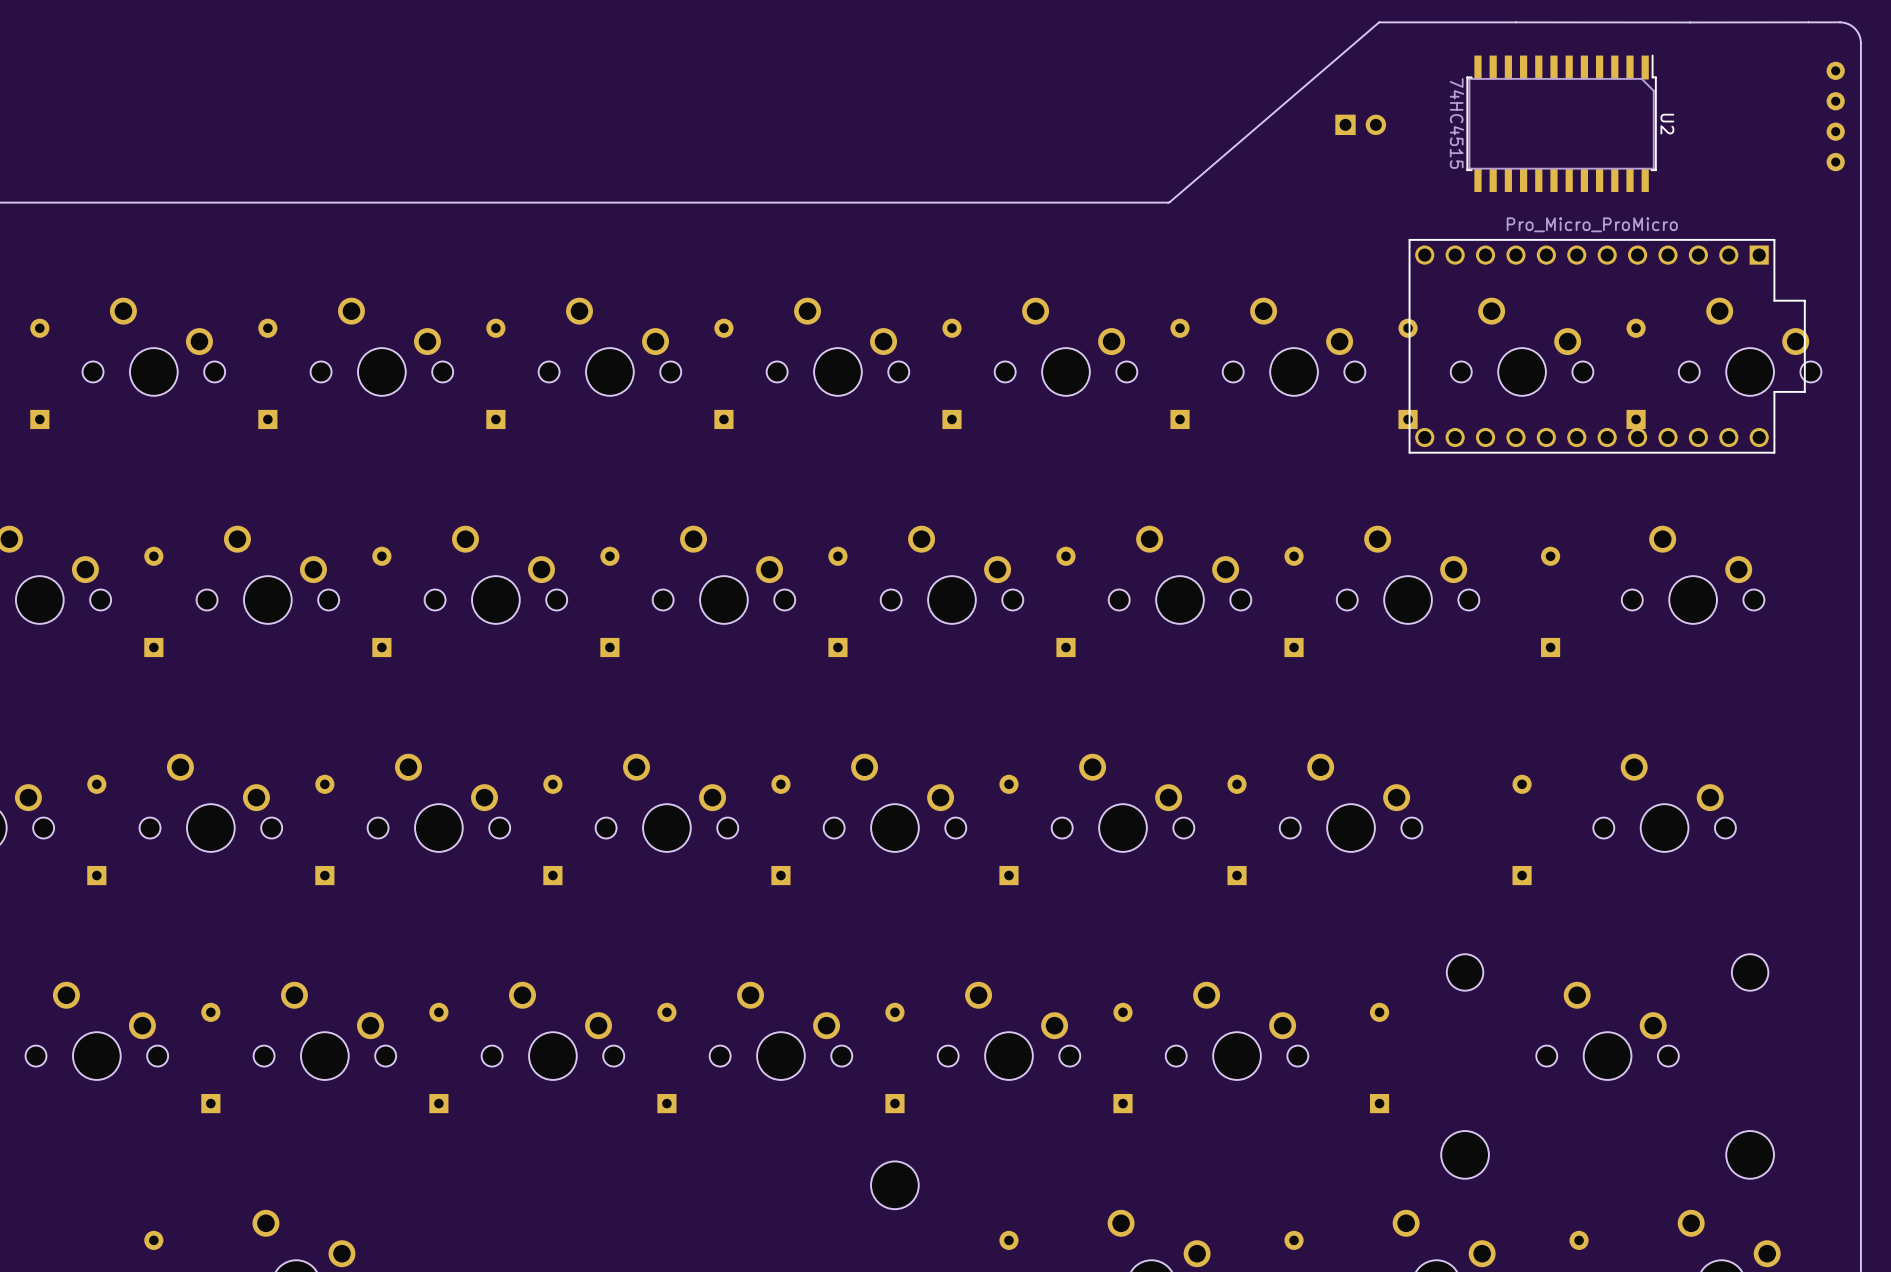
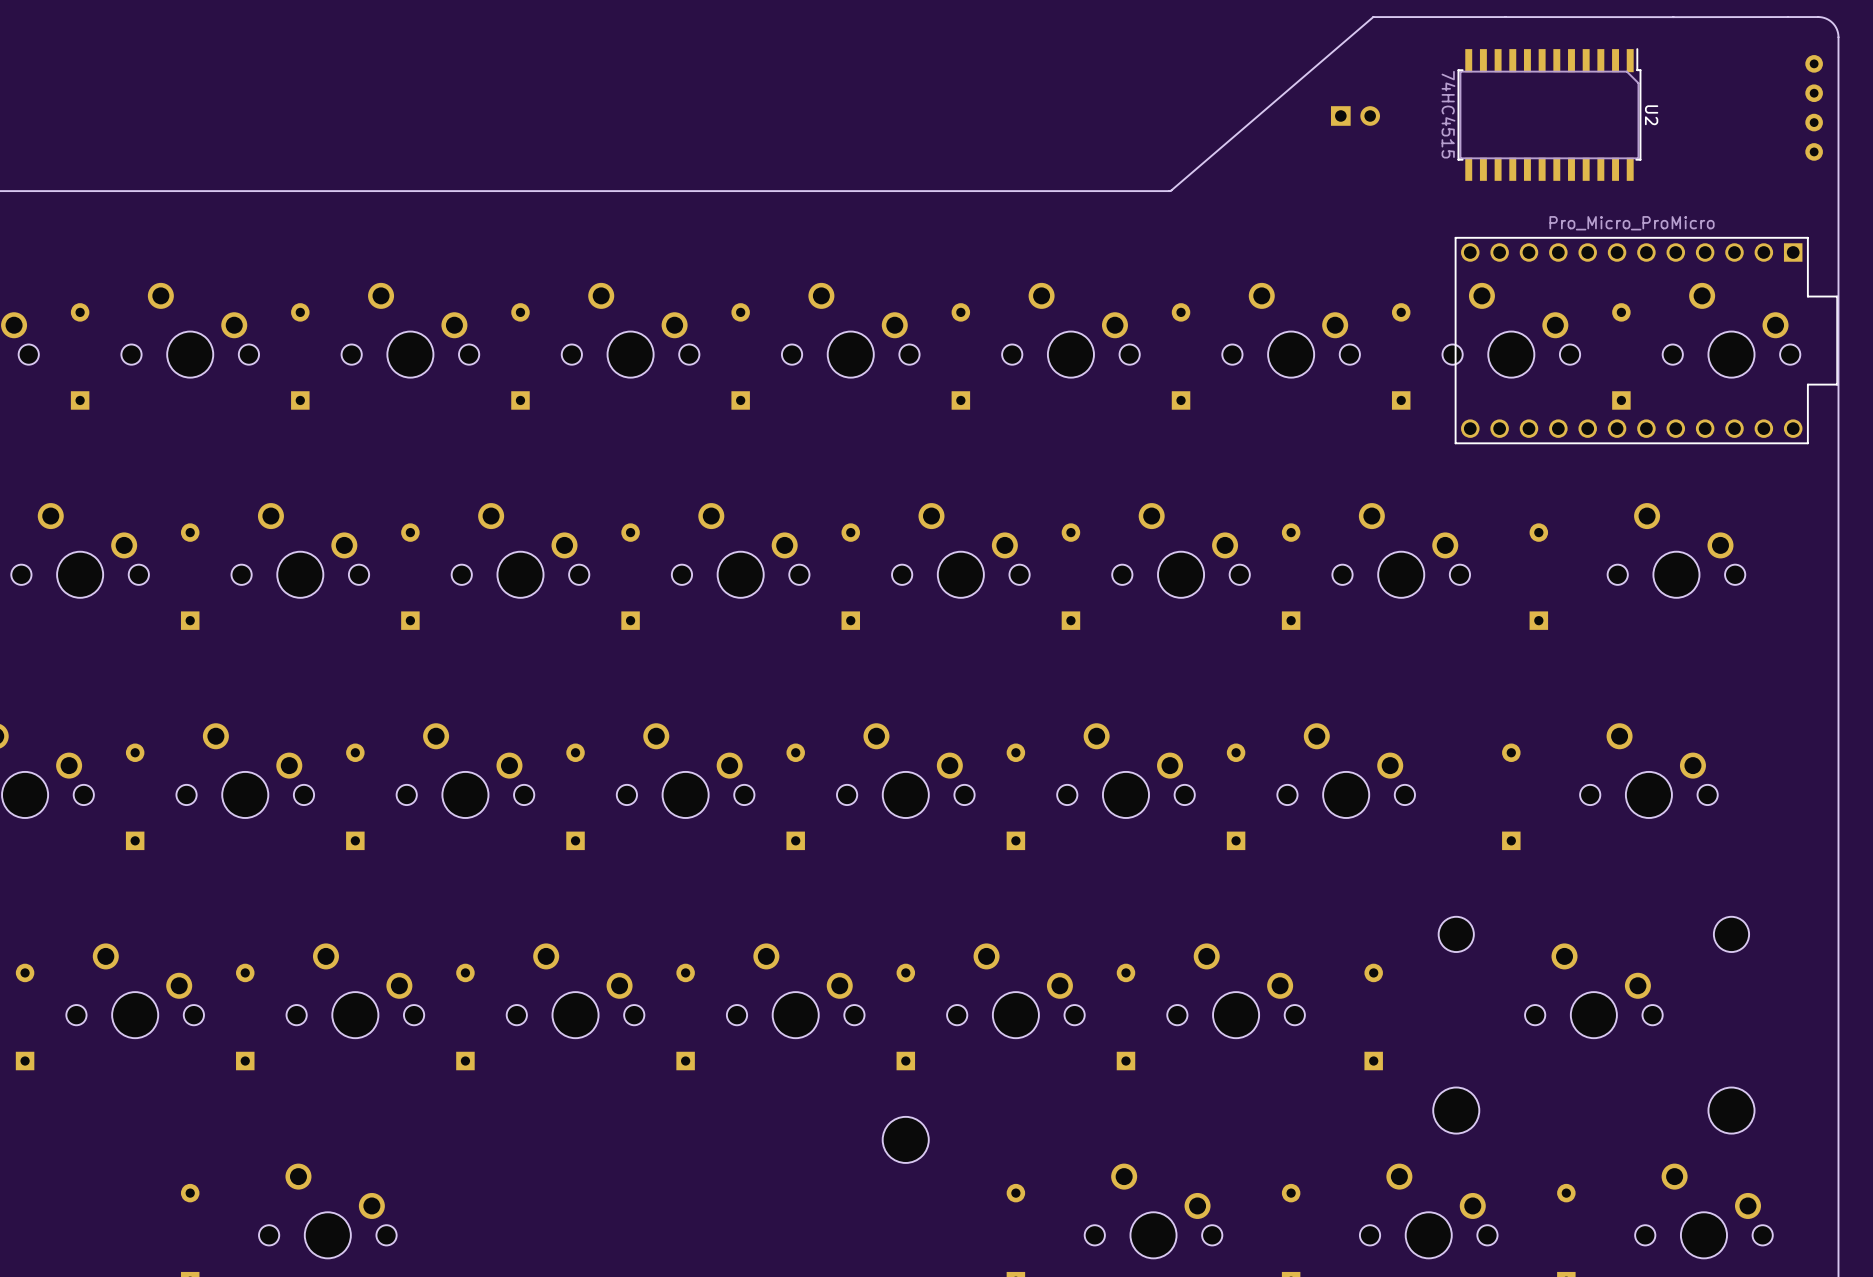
part position: (1607, 346) -> (1646, 340)

